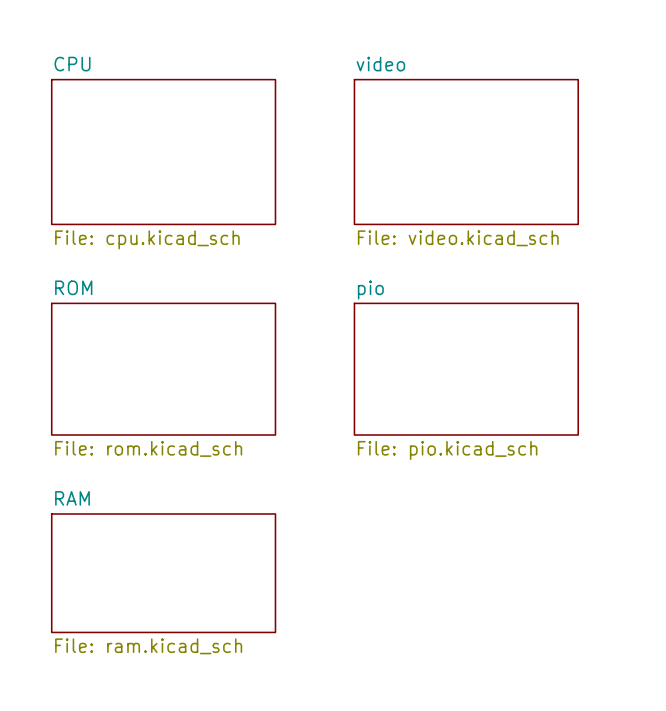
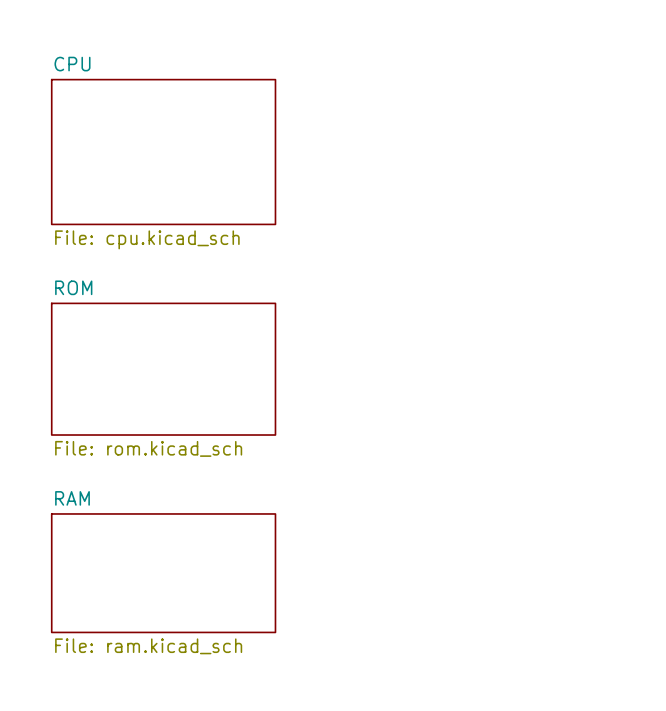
sheet video: File: video.kicad_sch (466, 152) -> none
sheet pio: File: pio.kicad_sch (466, 369) -> none

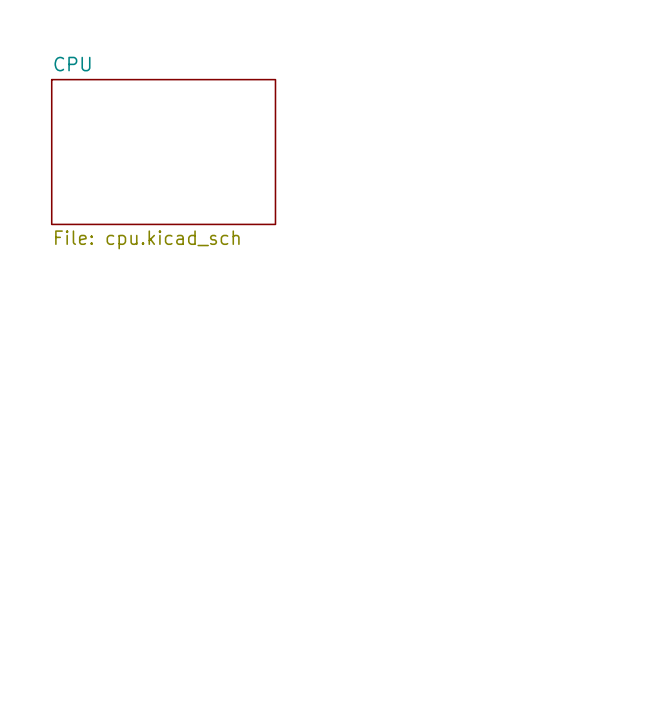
sheet ROM: File: rom.kicad_sch (163, 369) -> none
sheet RAM: File: ram.kicad_sch (163, 573) -> none

